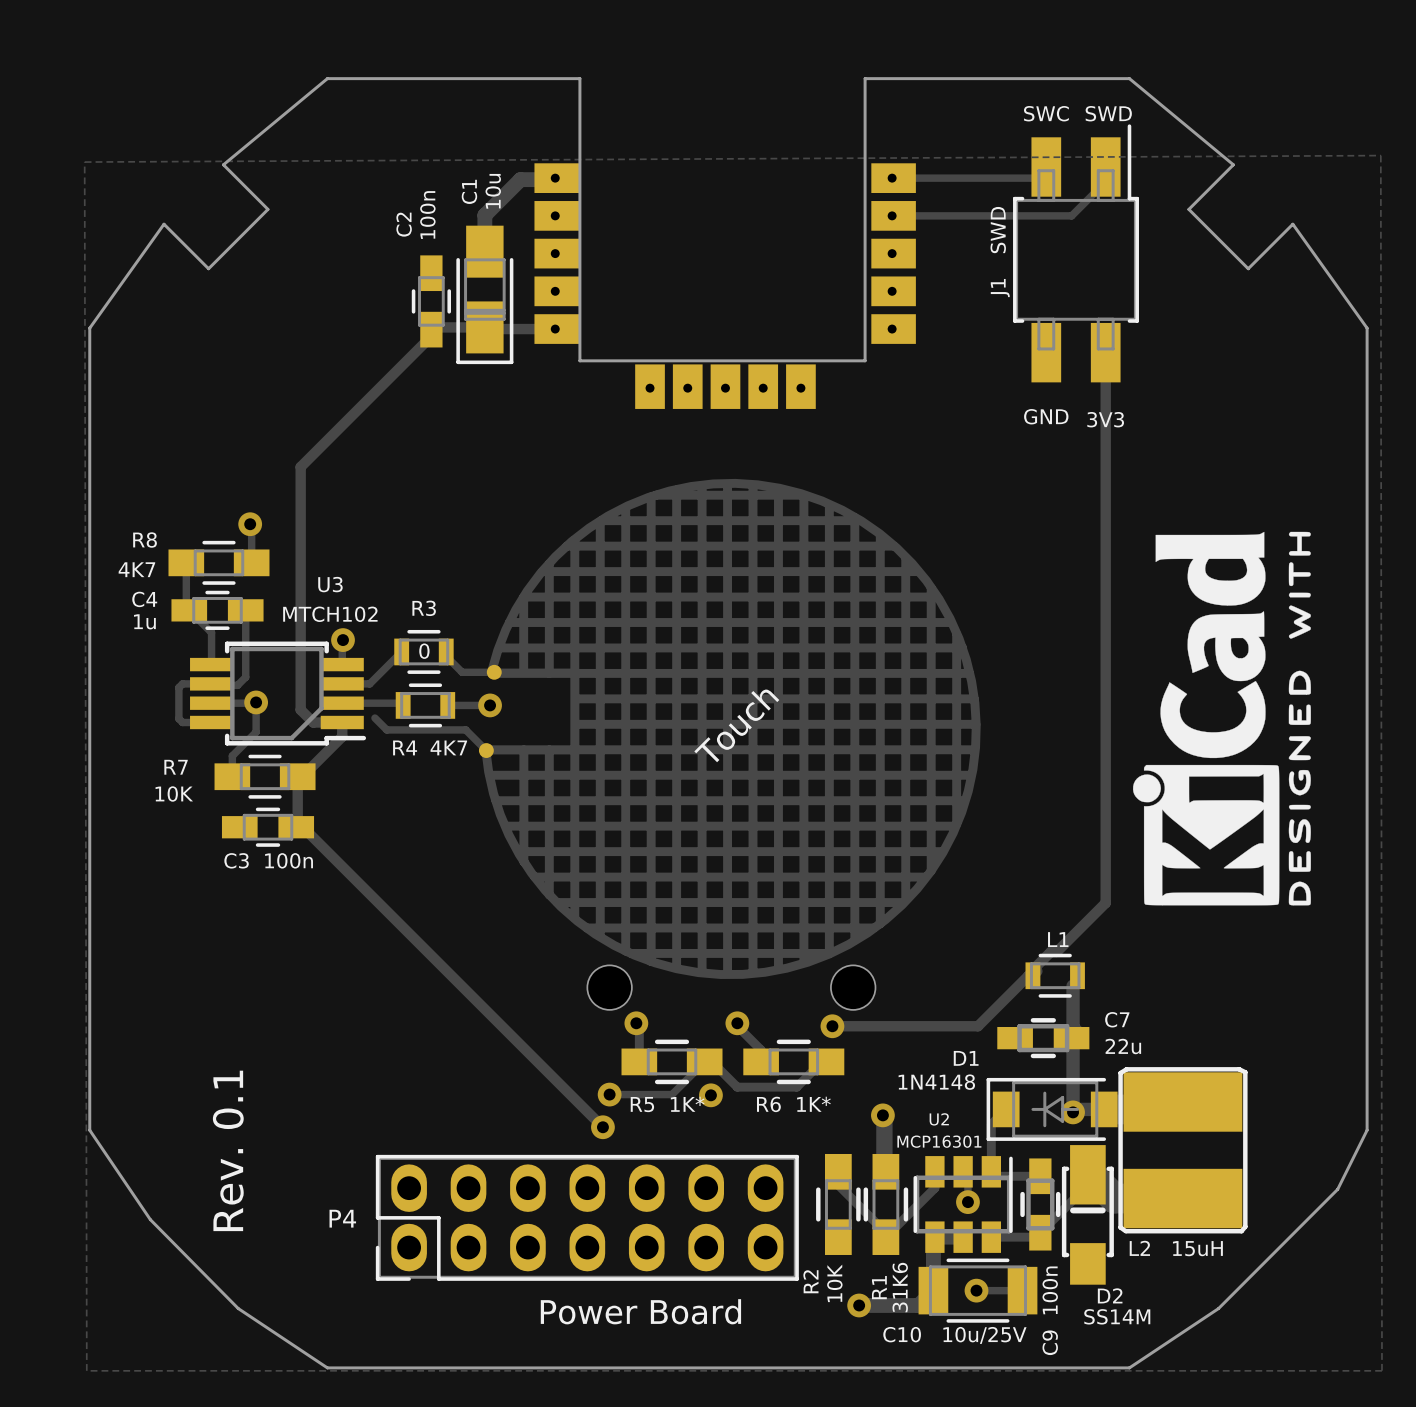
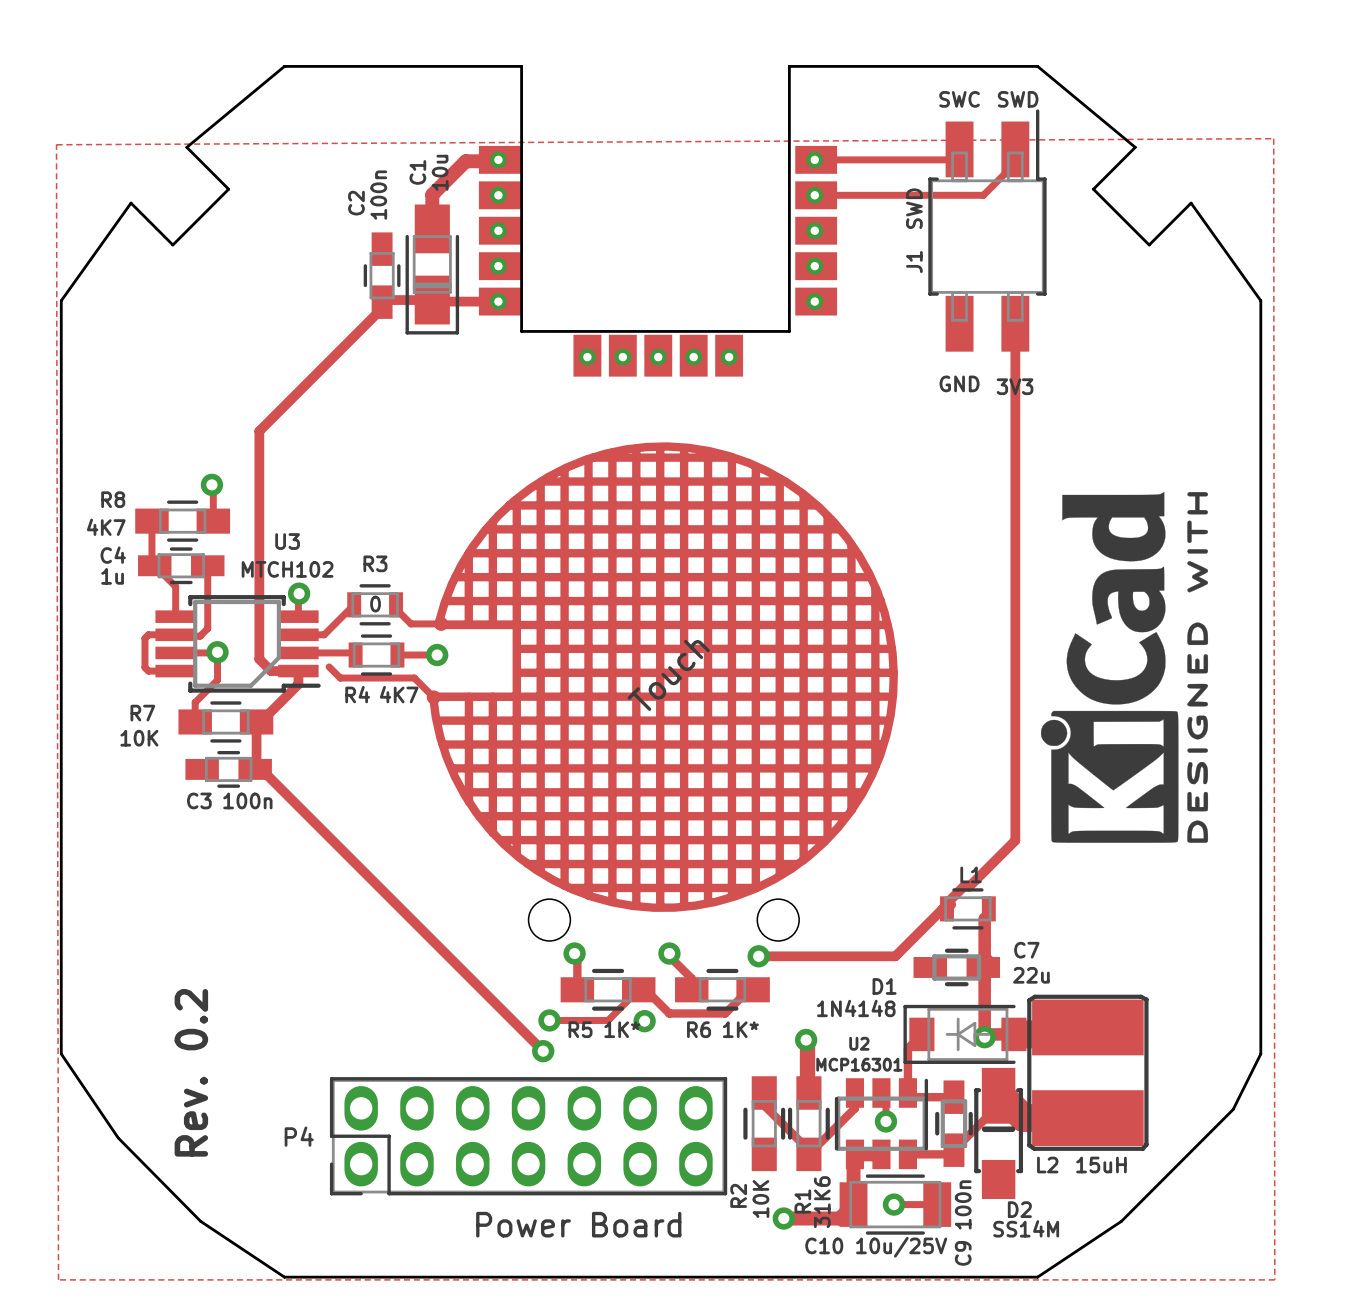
text: Rev. 0.1 (228, 1150) -> Rev. 0.2 (191, 1072)

